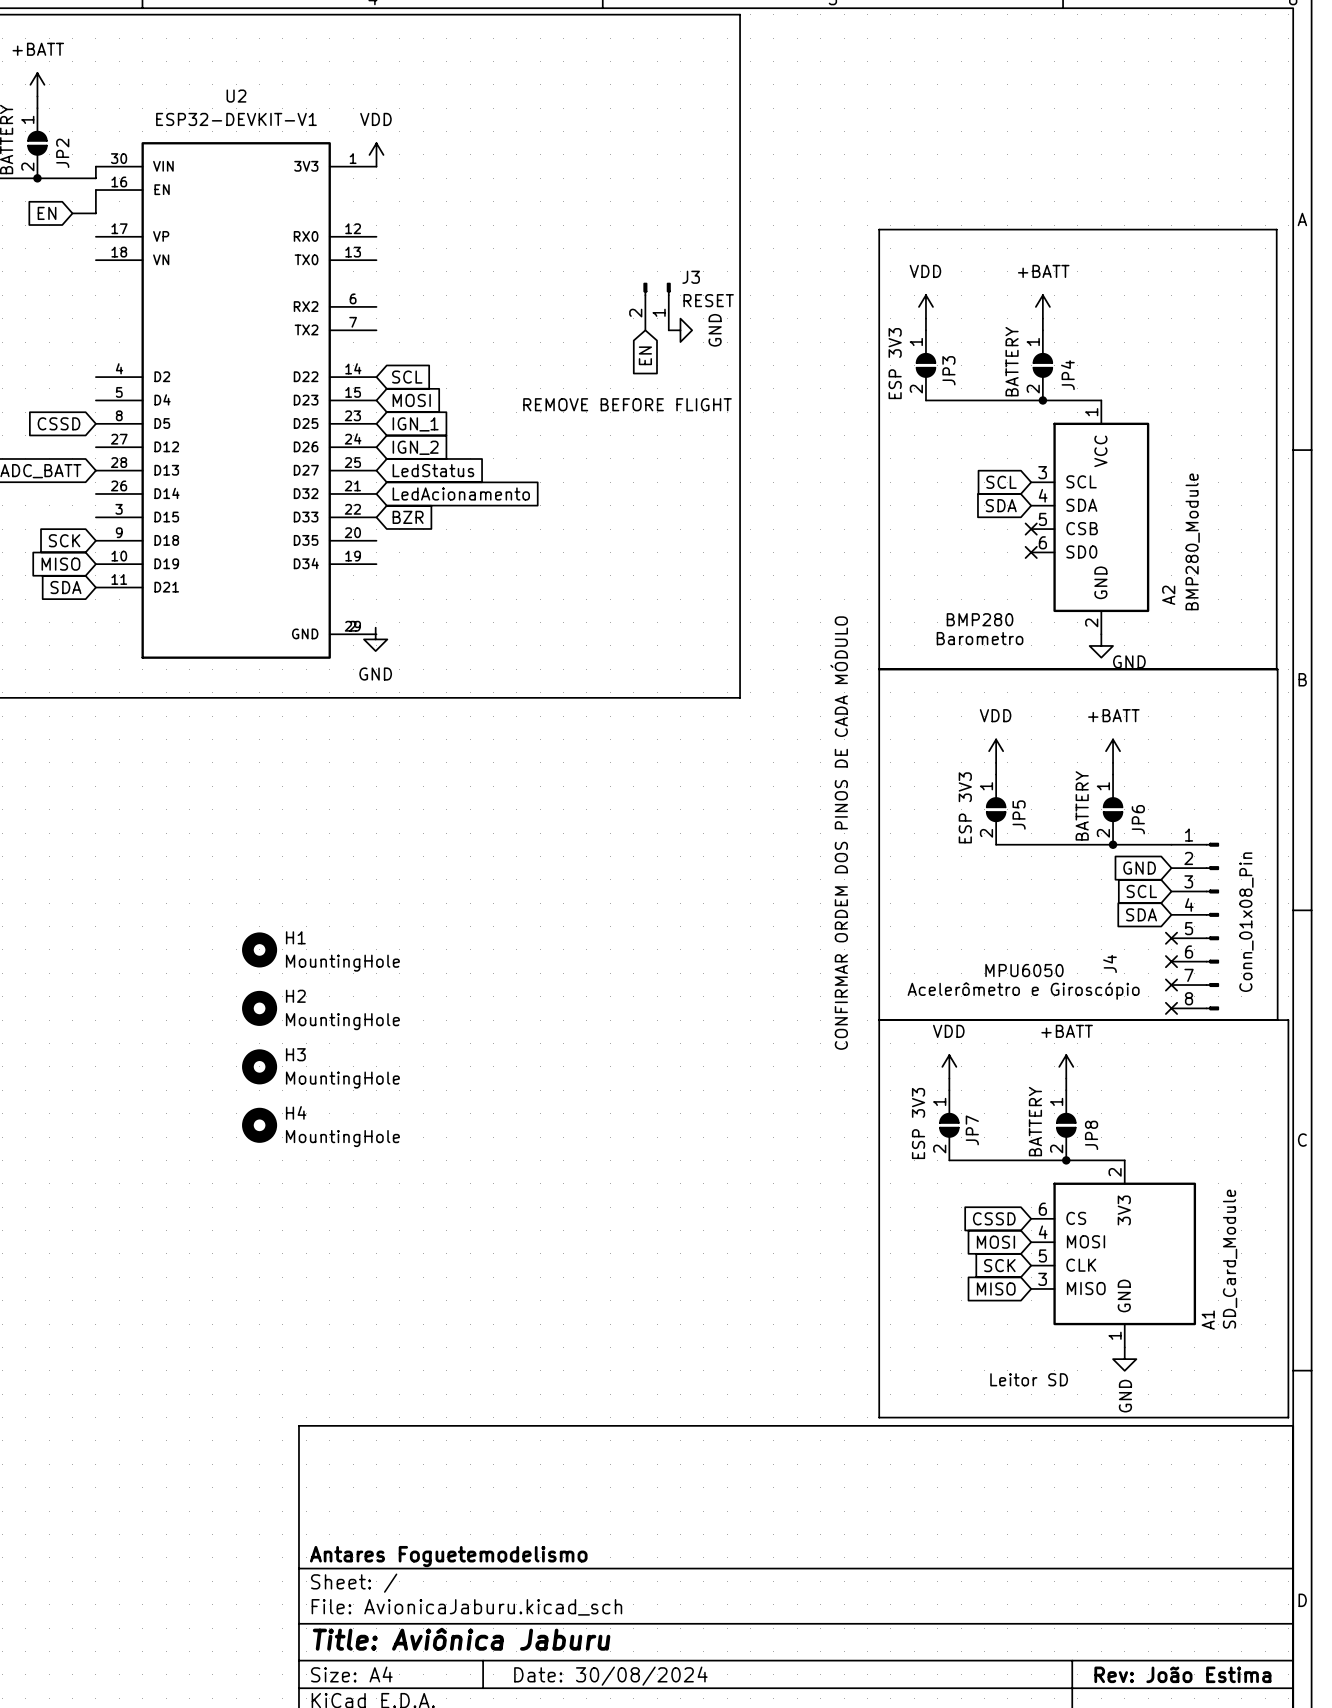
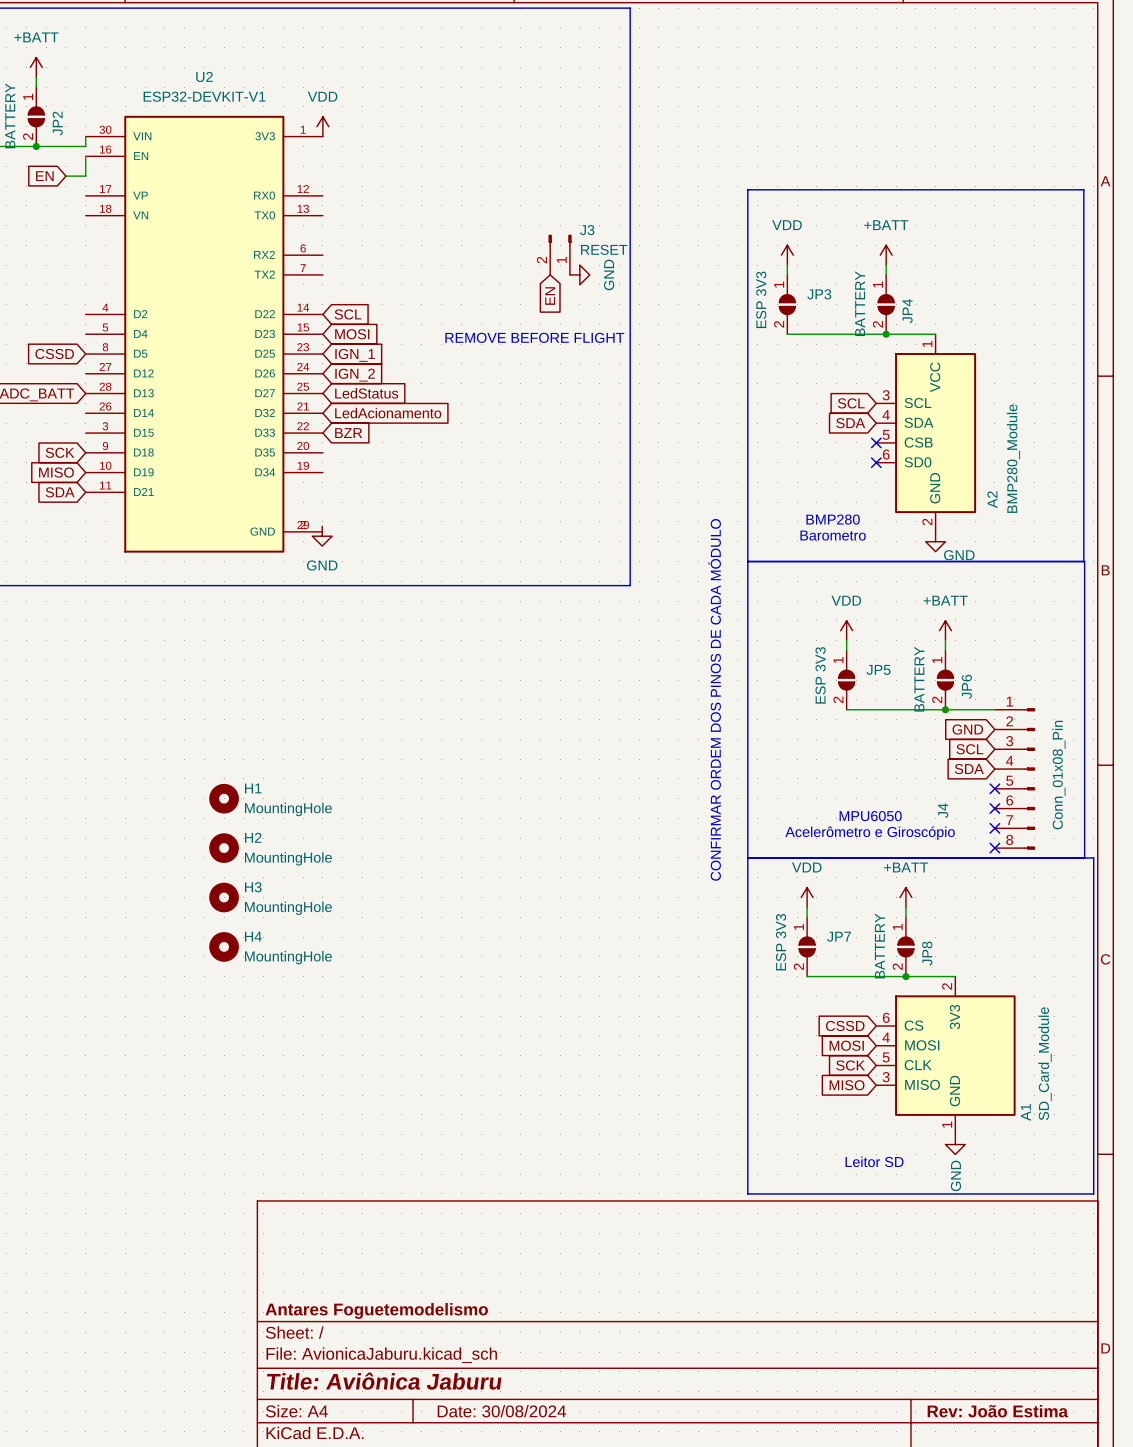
JP3 name rotation: 0° (948, 370) -> 90° clockwise (819, 294)
JP5 name rotation: 0° (1019, 815) -> 90° clockwise (878, 669)
JP7 name rotation: 0° (972, 1130) -> 90° clockwise (839, 936)

